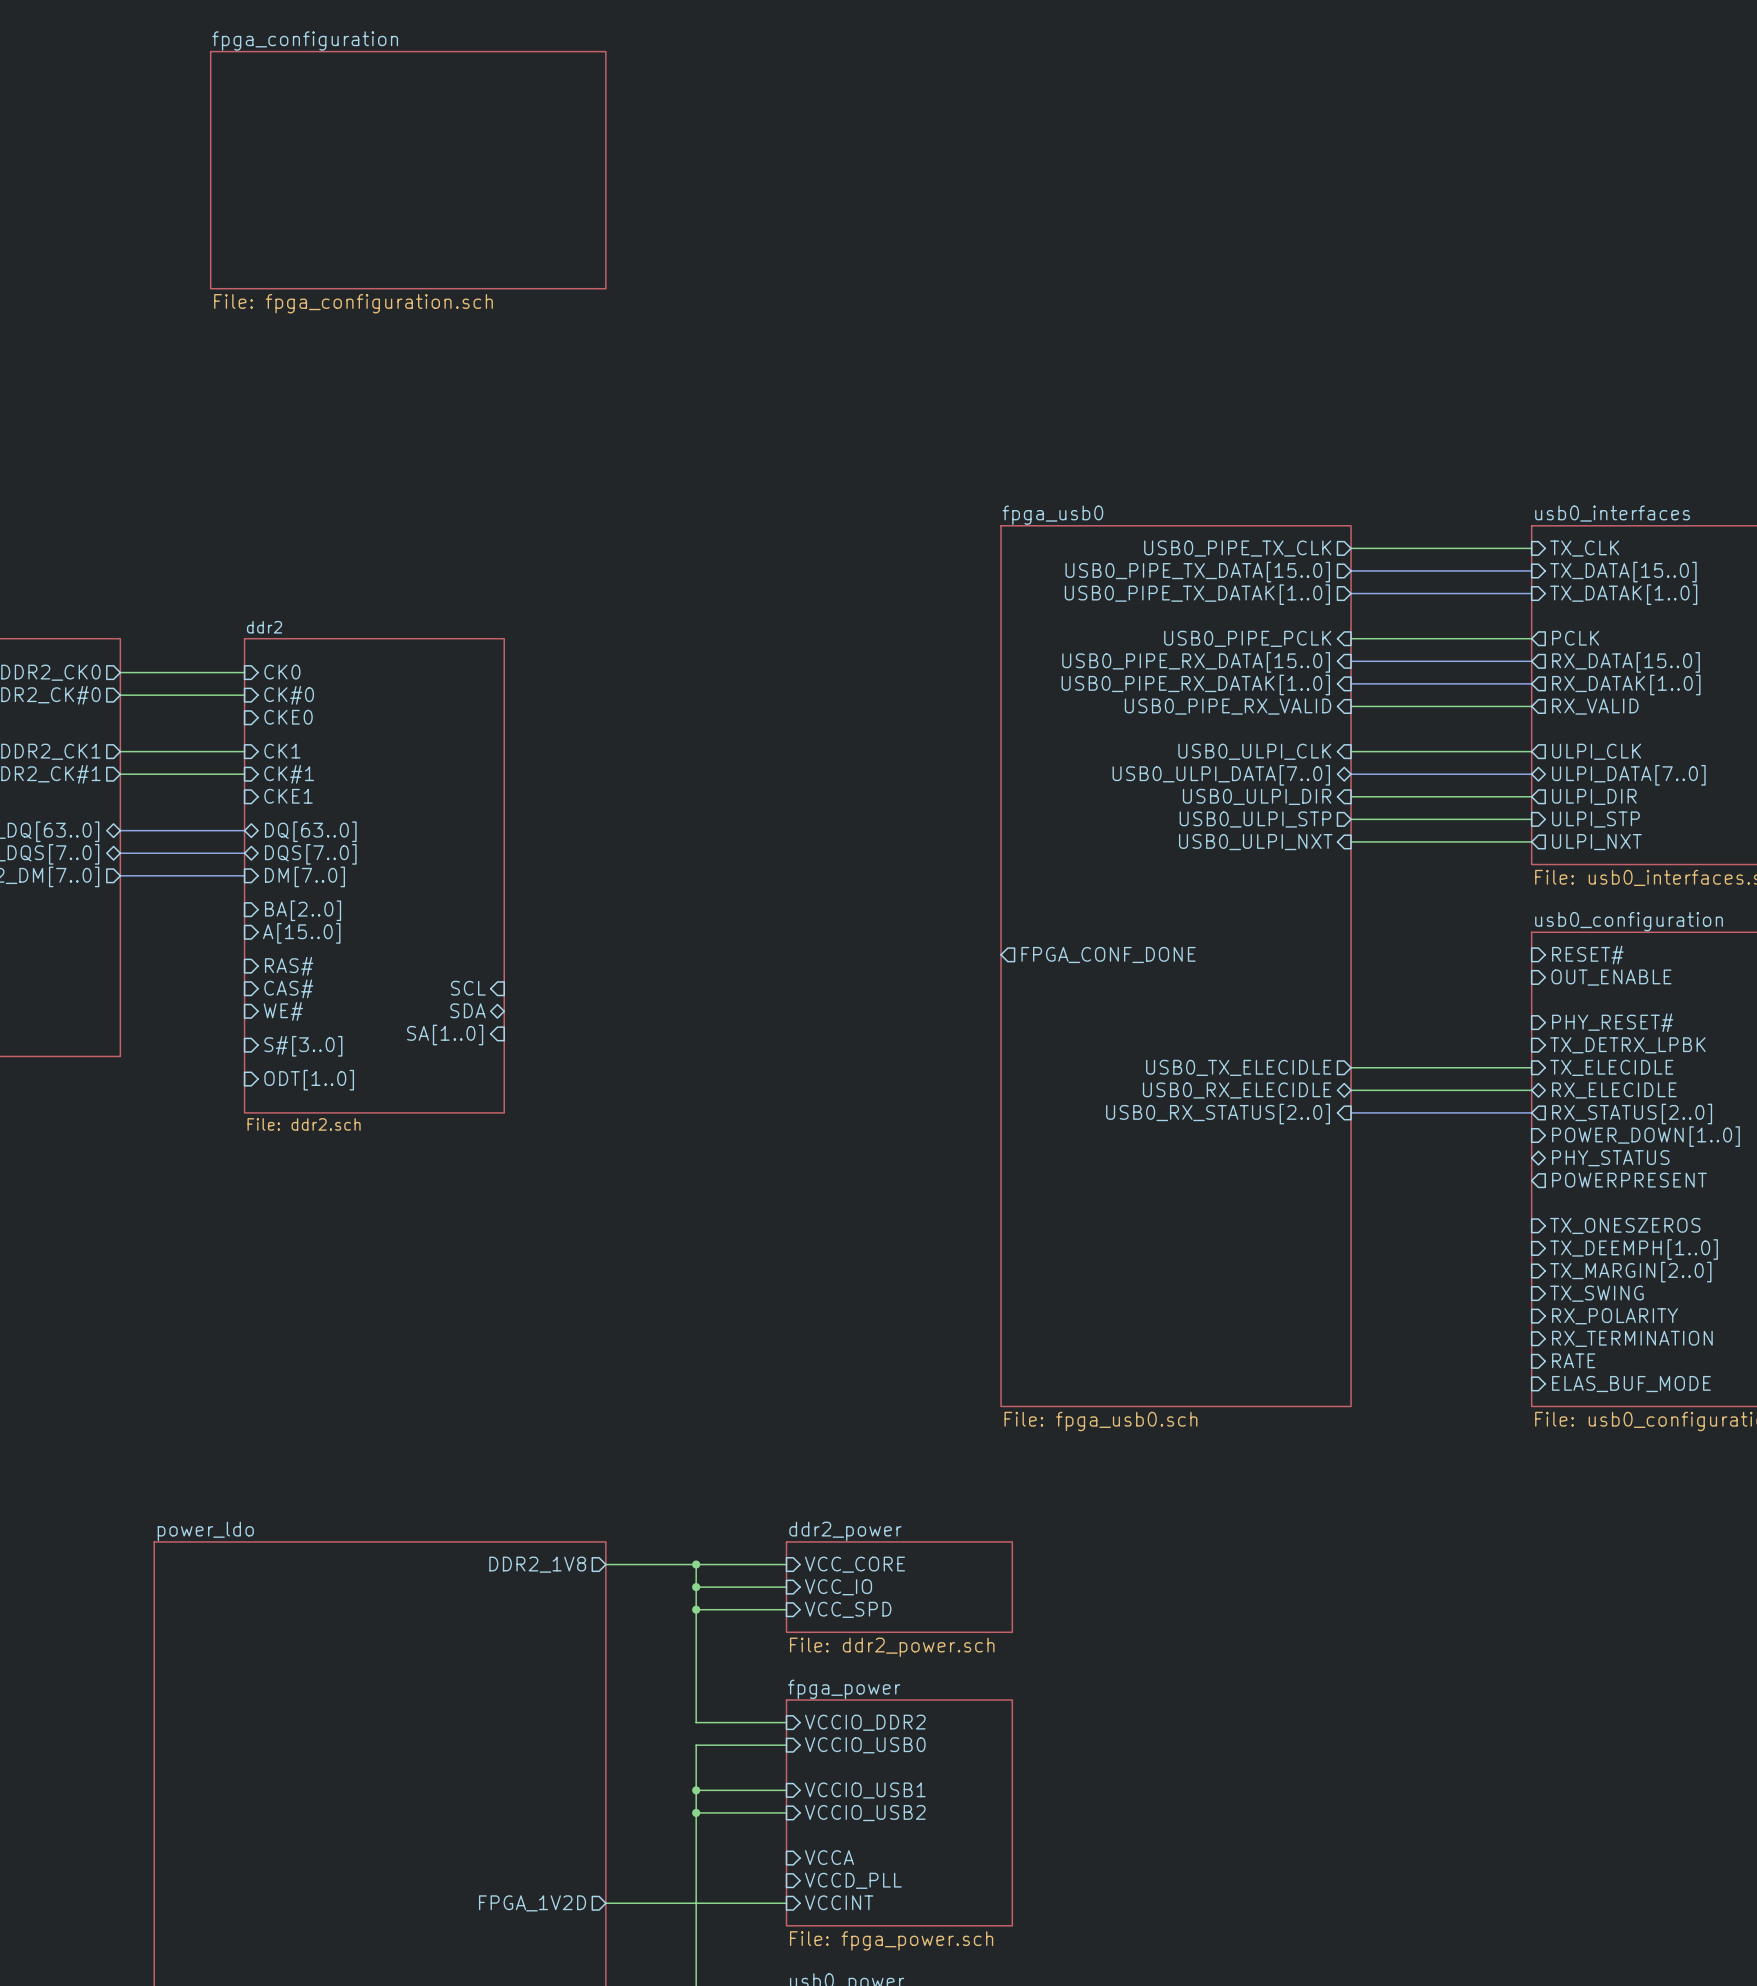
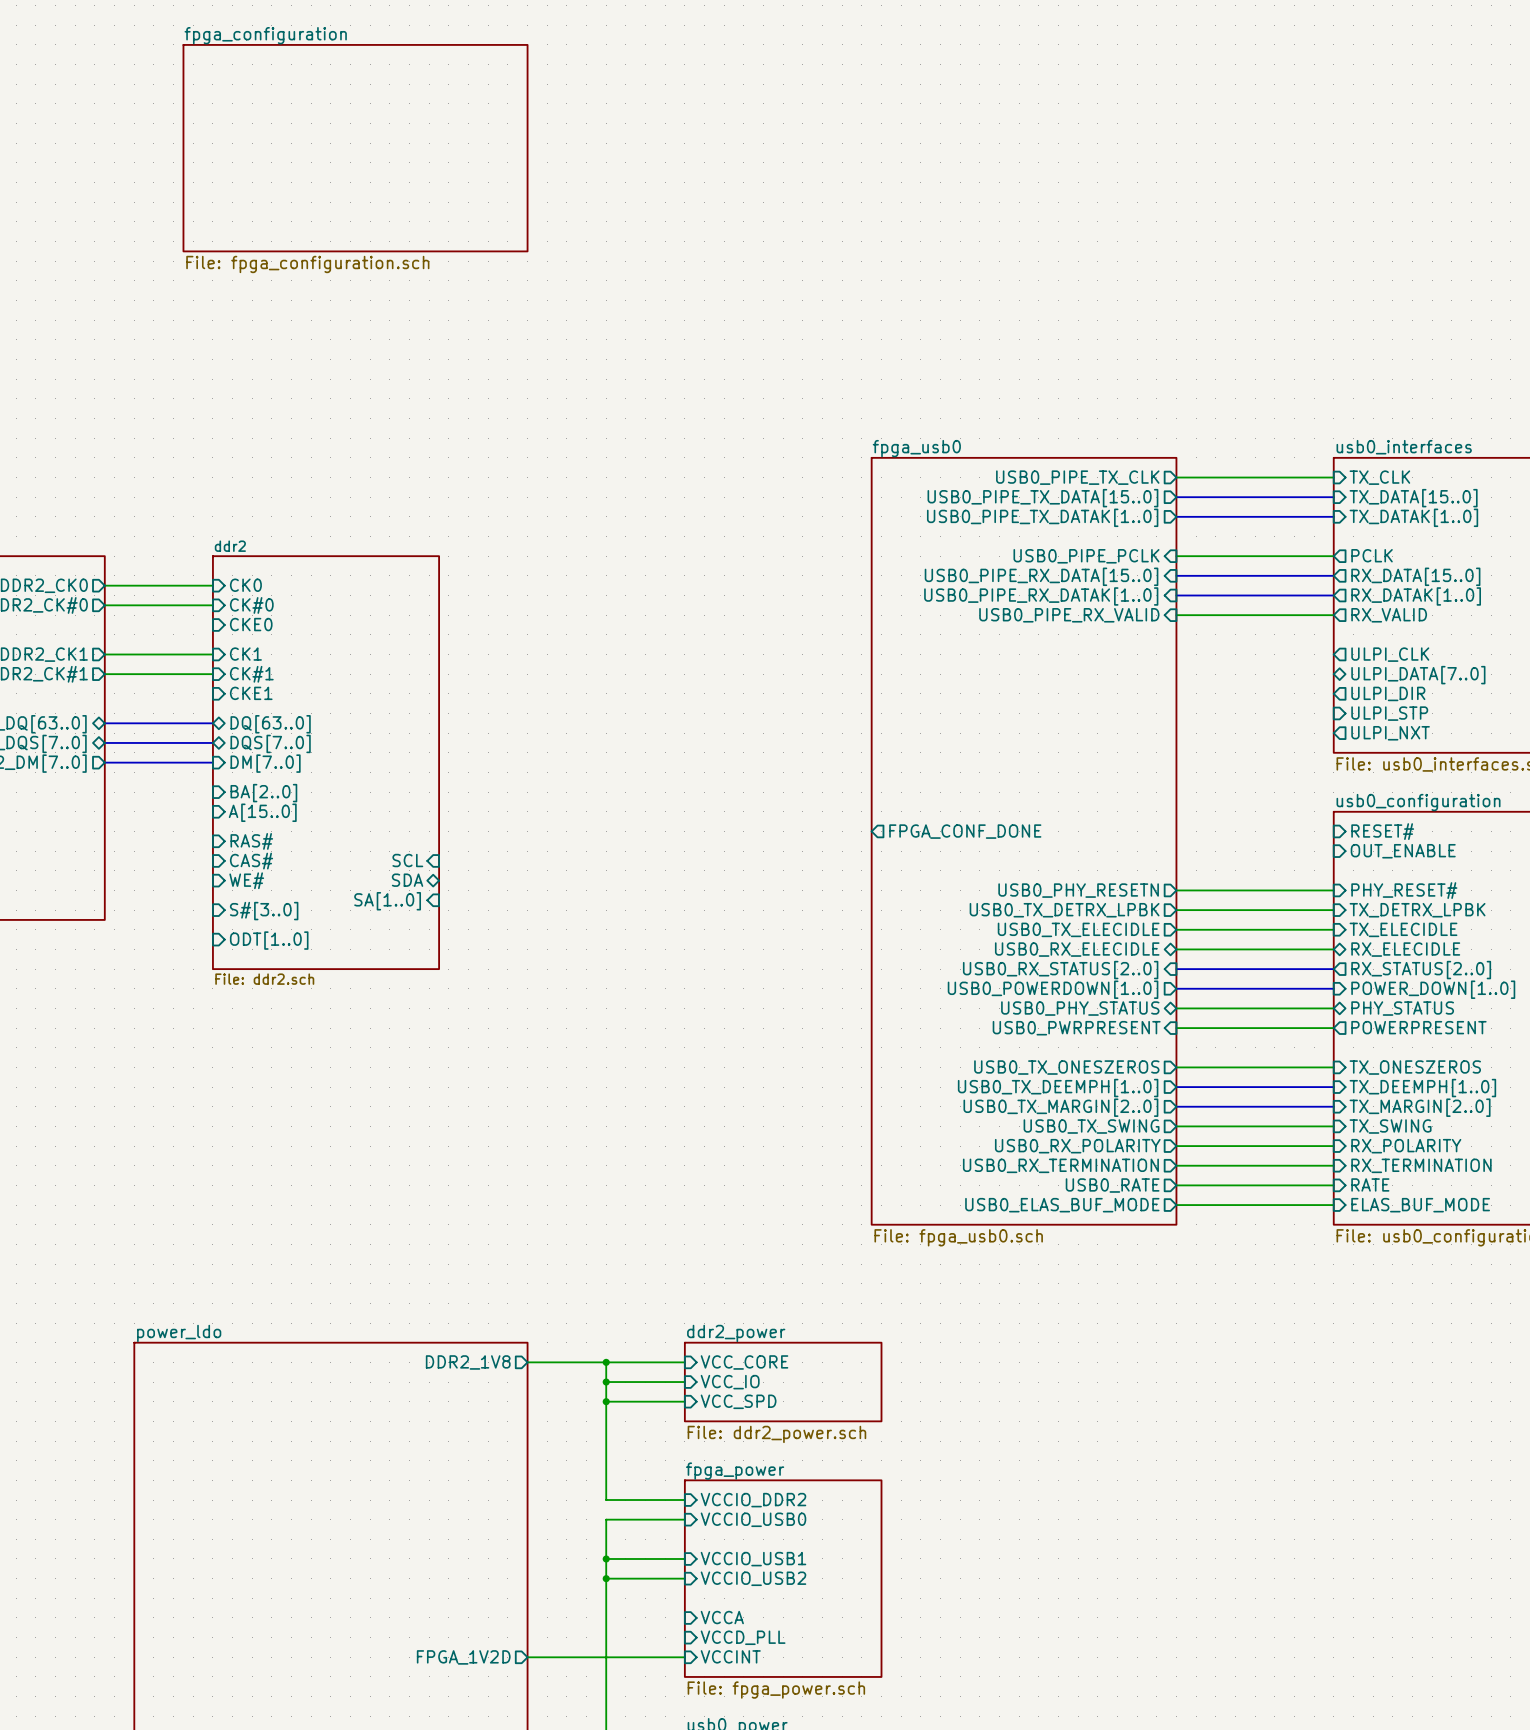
sheet pin: USB0_ULPI_CLK (1254, 751) -> none
wire: (1351, 751) (1531, 751) -> none
bus: (1351, 774) (1531, 774) -> none
sheet pin: USB0_ULPI_DATA[7..0] (1221, 775) -> none
sheet pin: USB0_ULPI_DIR (1257, 796) -> none
wire: (1351, 796) (1531, 796) -> none
sheet pin: USB0_ULPI_STP (1255, 819) -> none
wire: (1351, 819) (1531, 819) -> (1176, 890) (1333, 890)
wire: (1351, 841) (1531, 841) -> (1176, 910) (1333, 910)
sheet pin: USB0_ULPI_NXT (1255, 842) -> none
sheet pin: none -> USB0_PHY_RESETN (1078, 890)
sheet pin: none -> USB0_TX_DETRX_LPBK (1064, 910)
bus: none -> (1176, 988) (1333, 988)
sheet pin: none -> USB0_POWERDOWN[1..0] (1053, 989)
sheet pin: none -> USB0_PHY_STATUS (1080, 1008)
wire: none -> (1176, 1008) (1333, 1008)
sheet pin: none -> USB0_PWRPRESENT (1076, 1028)
wire: none -> (1176, 1028) (1333, 1028)
sheet pin: none -> USB0_TX_ONESZEROS (1066, 1067)
wire: none -> (1176, 1067) (1333, 1067)
bus: none -> (1176, 1087) (1333, 1087)
sheet pin: none -> USB0_TX_DEEMPH[1..0] (1058, 1088)
bus: none -> (1176, 1106) (1333, 1106)
sheet pin: none -> USB0_TX_MARGIN[2..0] (1060, 1107)
sheet pin: none -> USB0_TX_SWING (1091, 1126)
wire: none -> (1176, 1126) (1333, 1126)
sheet pin: none -> USB0_RX_POLARITY (1077, 1146)
wire: none -> (1176, 1146) (1333, 1146)
sheet pin: none -> USB0_RX_TERMINATION (1060, 1165)
wire: none -> (1176, 1165) (1333, 1165)
sheet pin: none -> USB0_RATE (1112, 1185)
wire: none -> (1176, 1185) (1333, 1185)
wire: none -> (1176, 1205) (1333, 1205)
sheet pin: none -> USB0_ELAS_BUF_MODE (1062, 1205)

